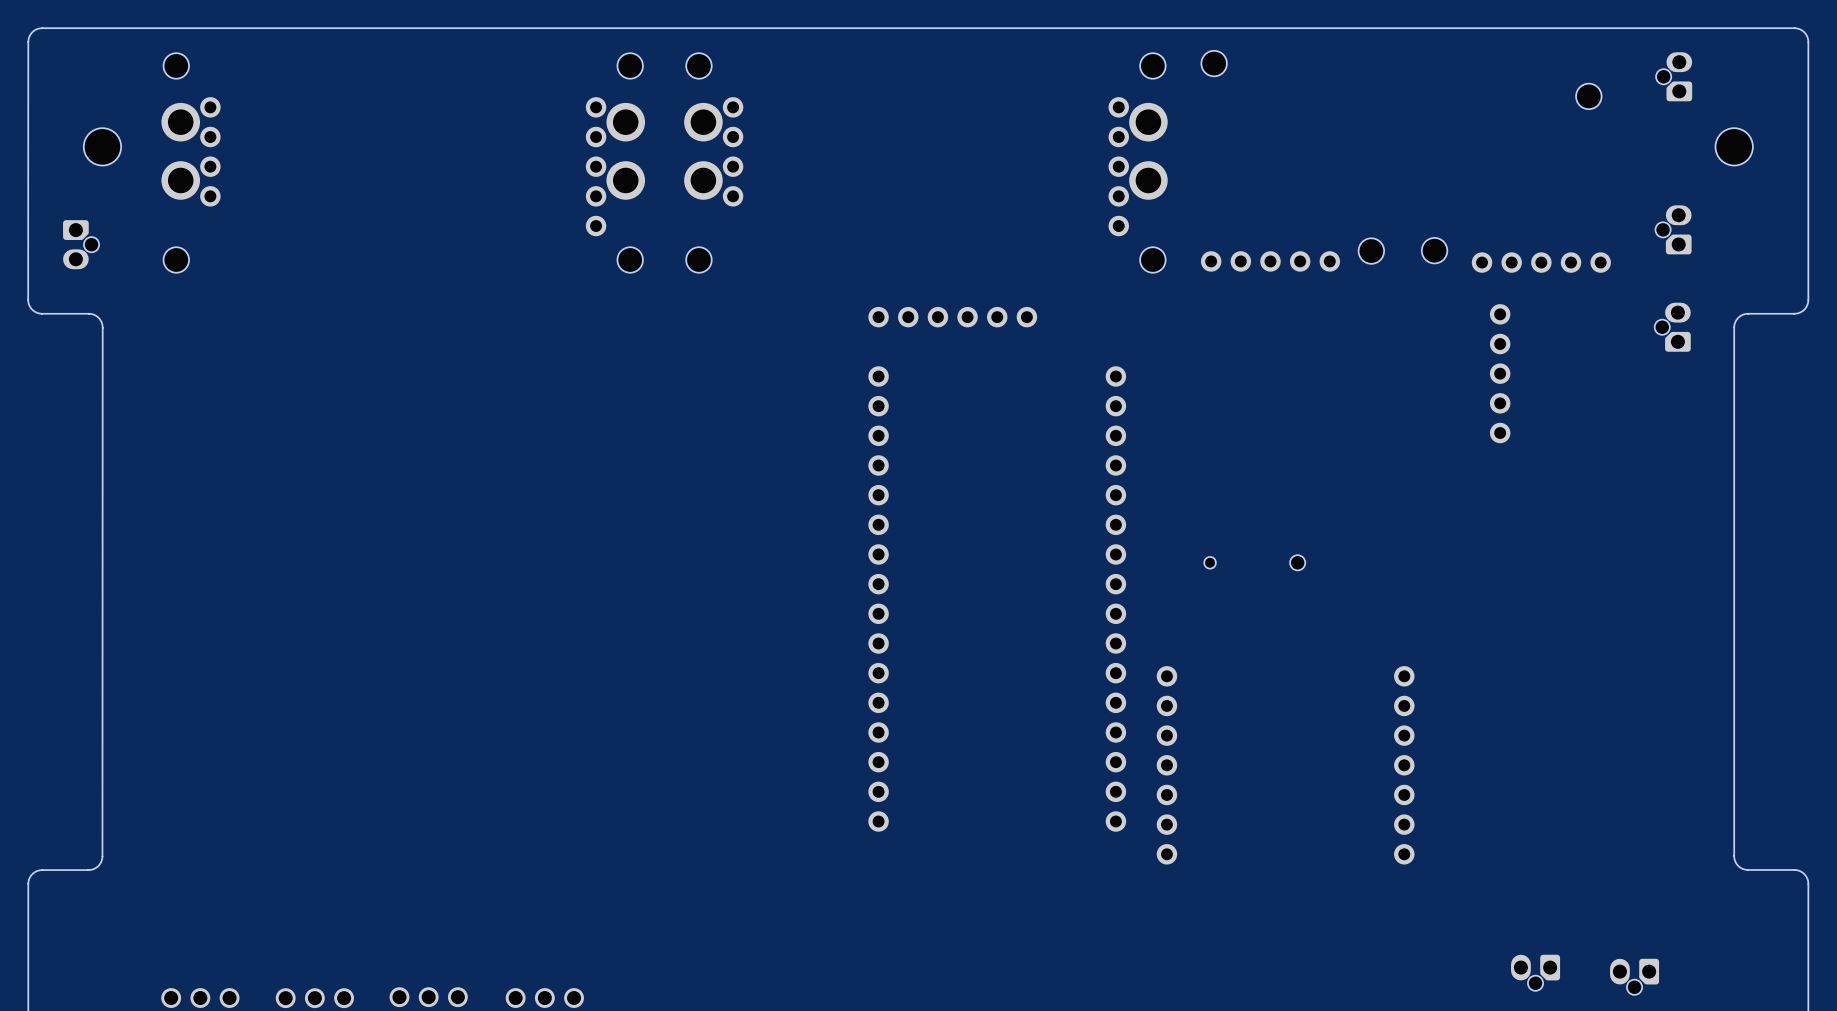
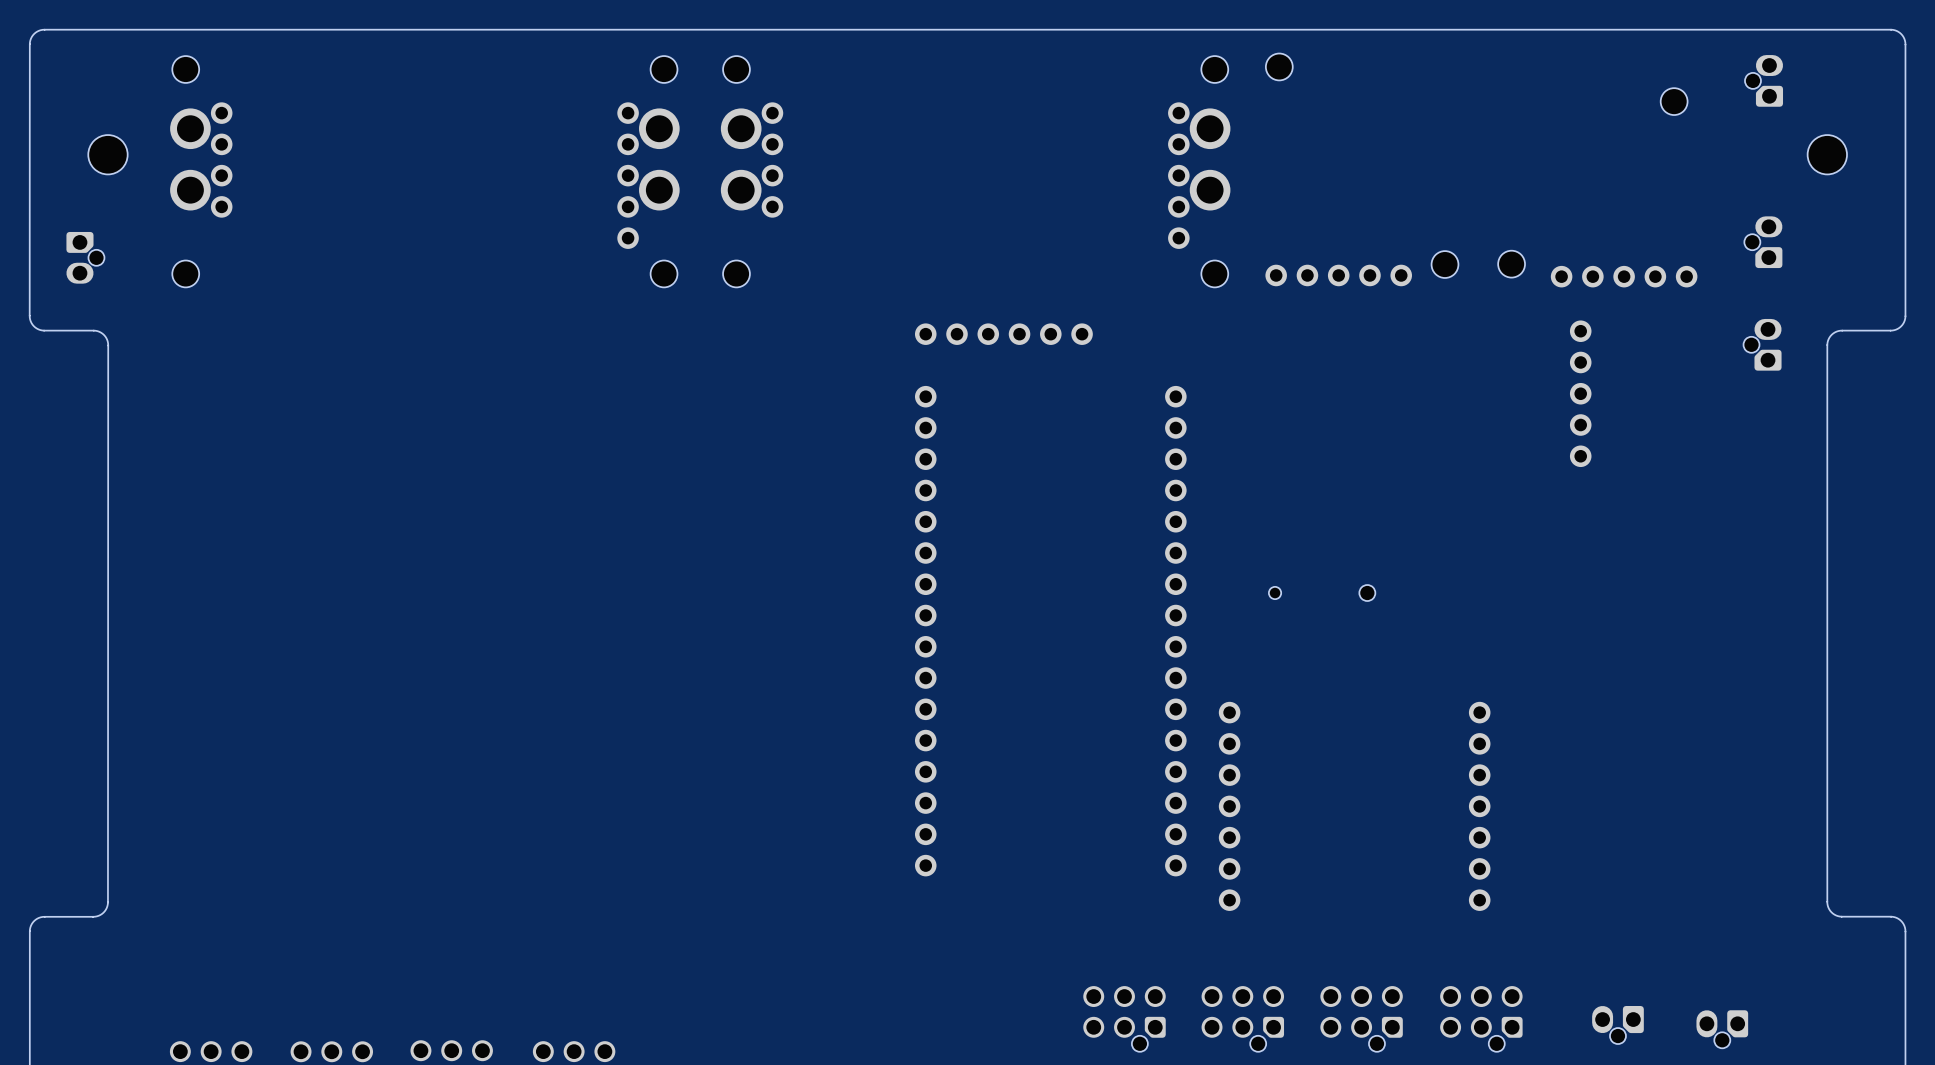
part: none -> (1124, 1018)
part: none -> (1242, 1018)
part: none -> (1361, 1018)
part: none -> (1481, 1018)

